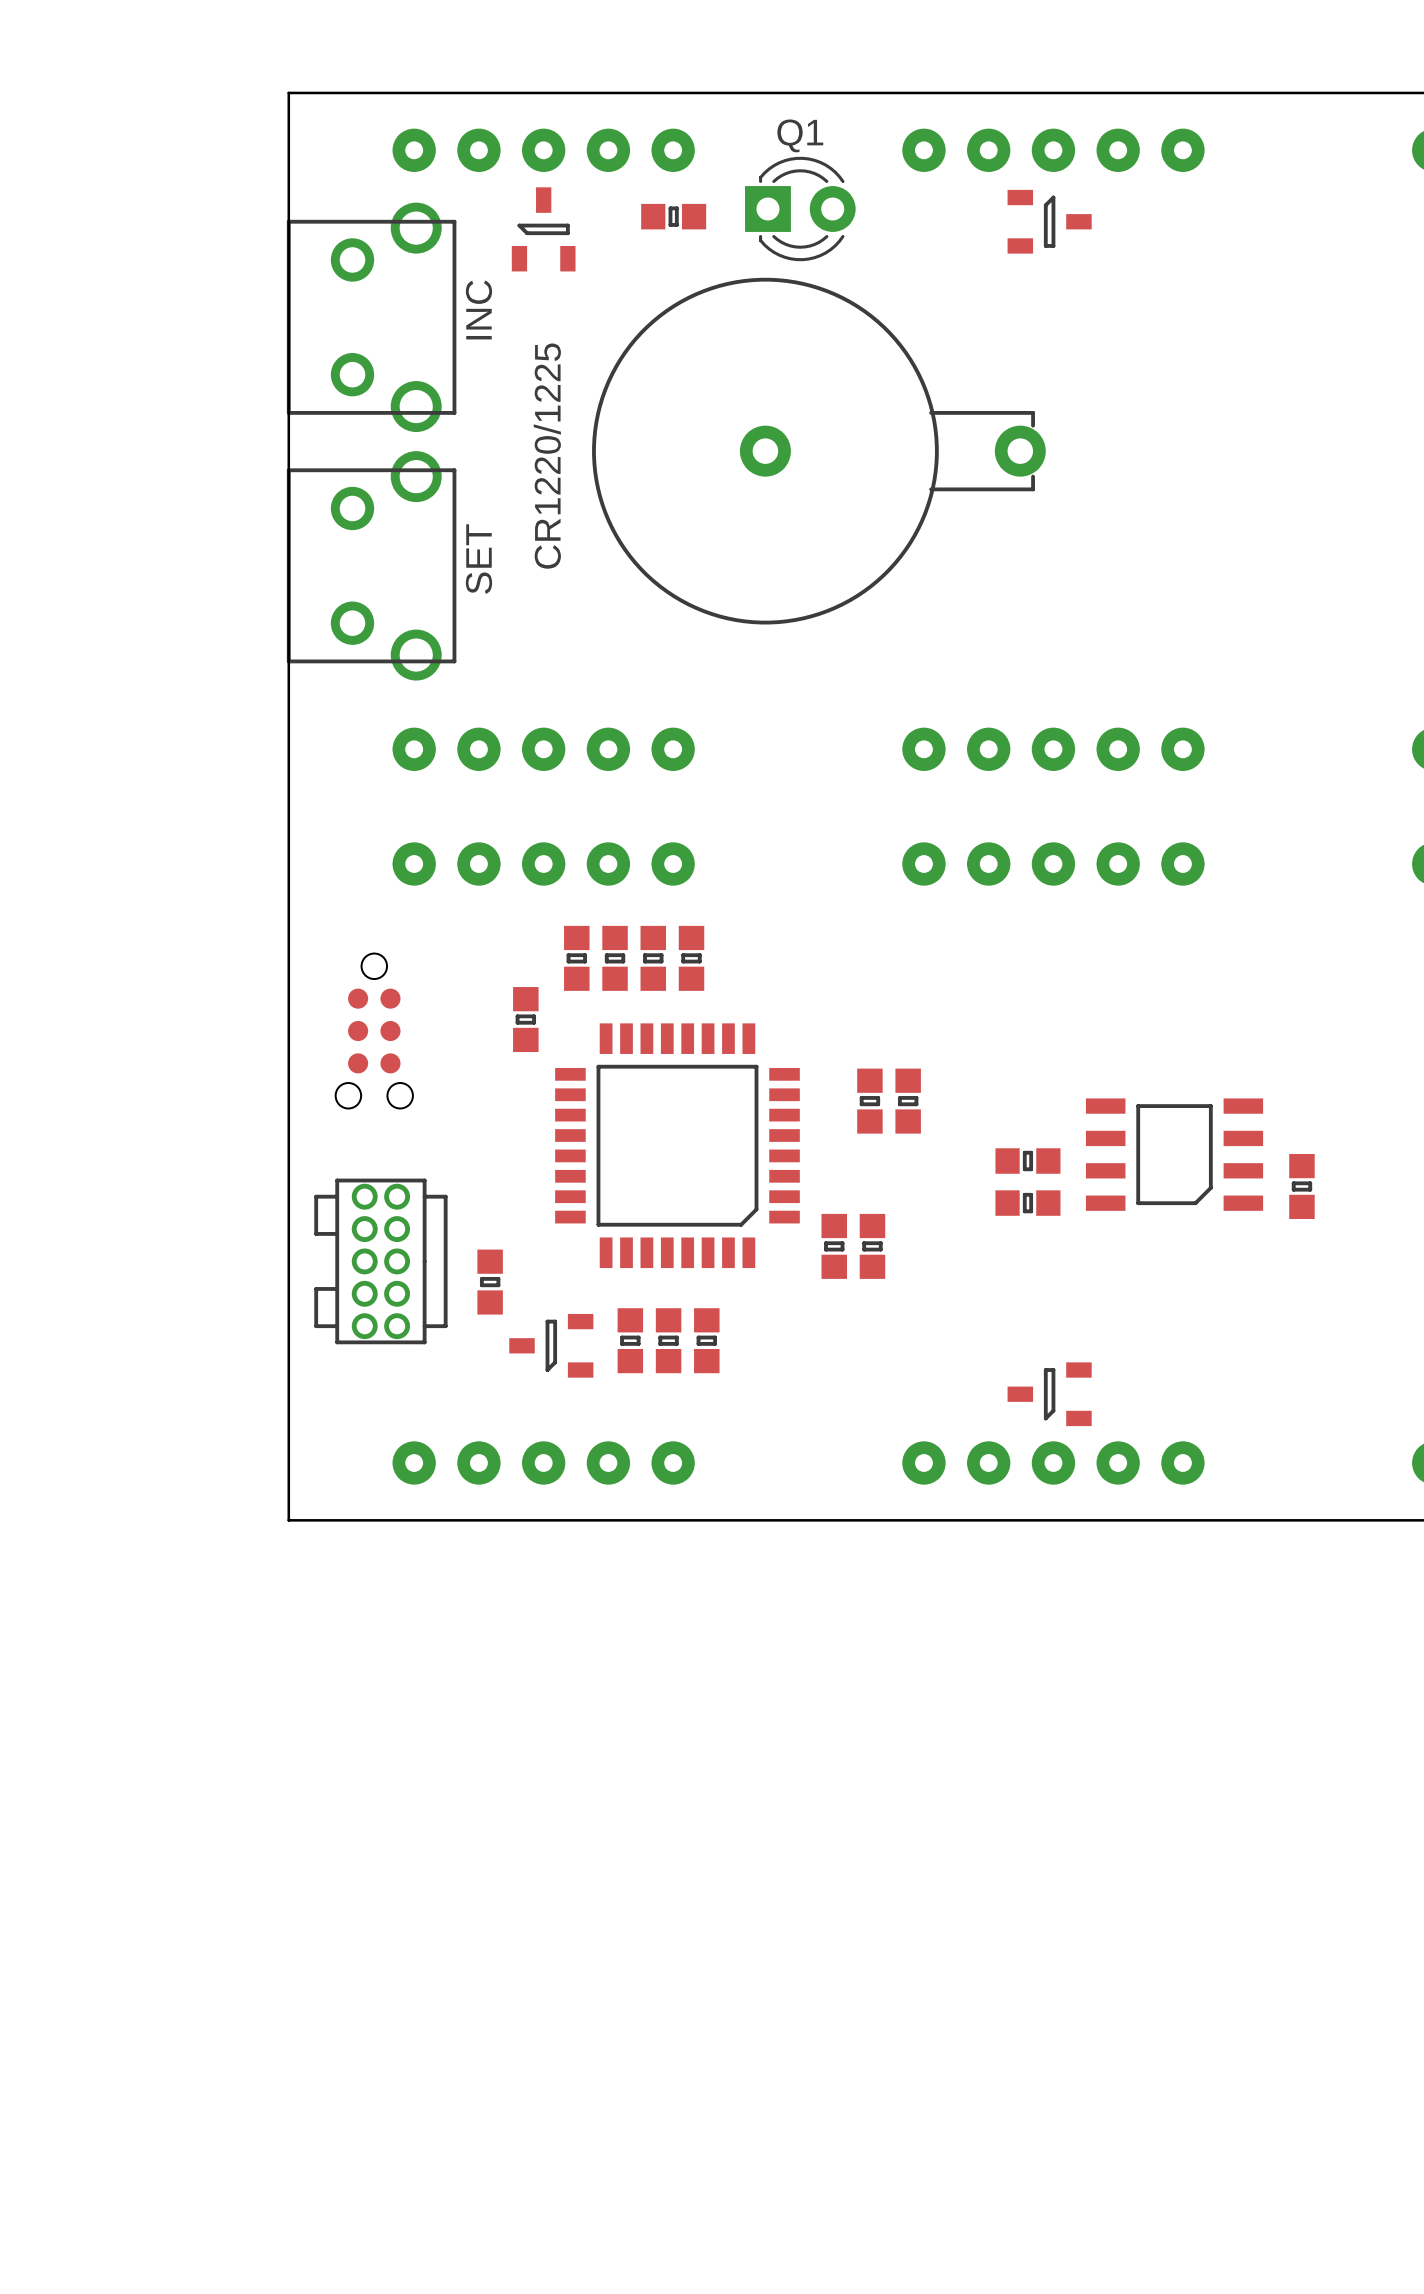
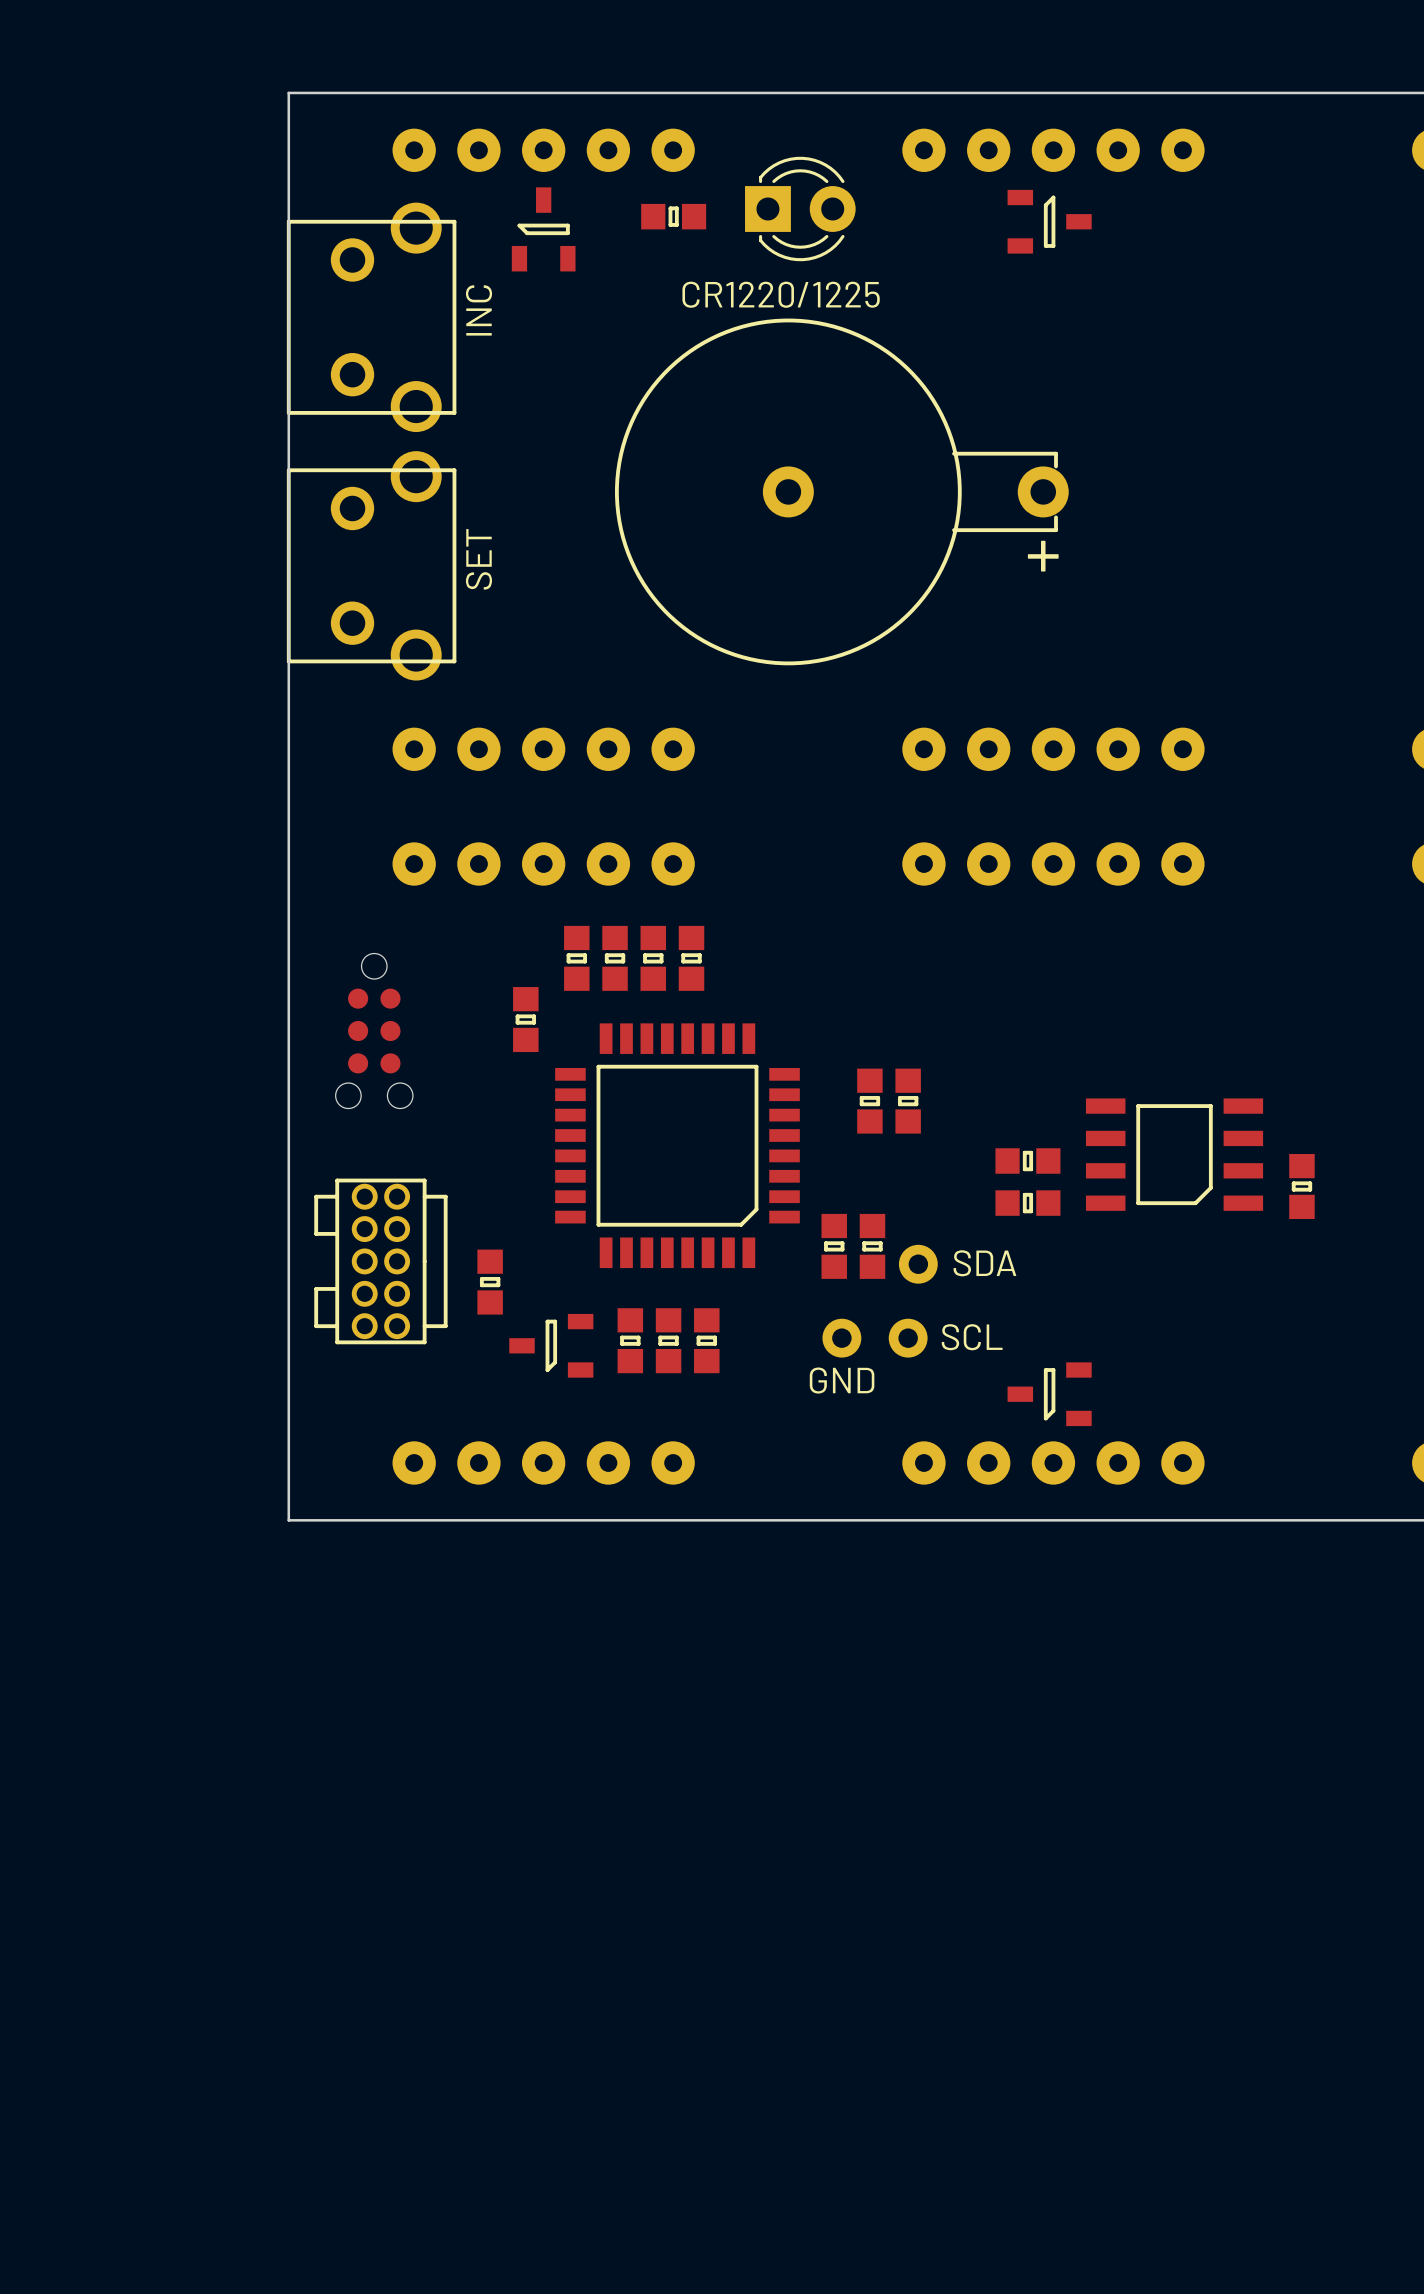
Q1 name: Q1 (800, 135) -> none
part position: (818, 451) -> (841, 491)
part value rotation: 0° (547, 456) -> 90° clockwise (781, 294)
text: none -> + (1043, 556)
part: none -> SDA (918, 1264)
part: none -> GND (841, 1338)
part: none -> SCL (908, 1338)

